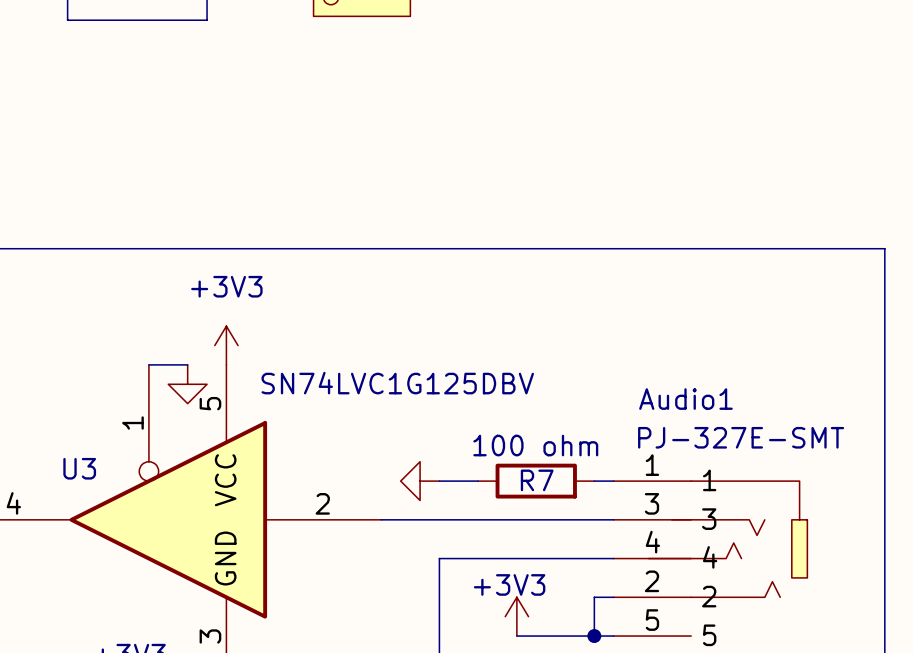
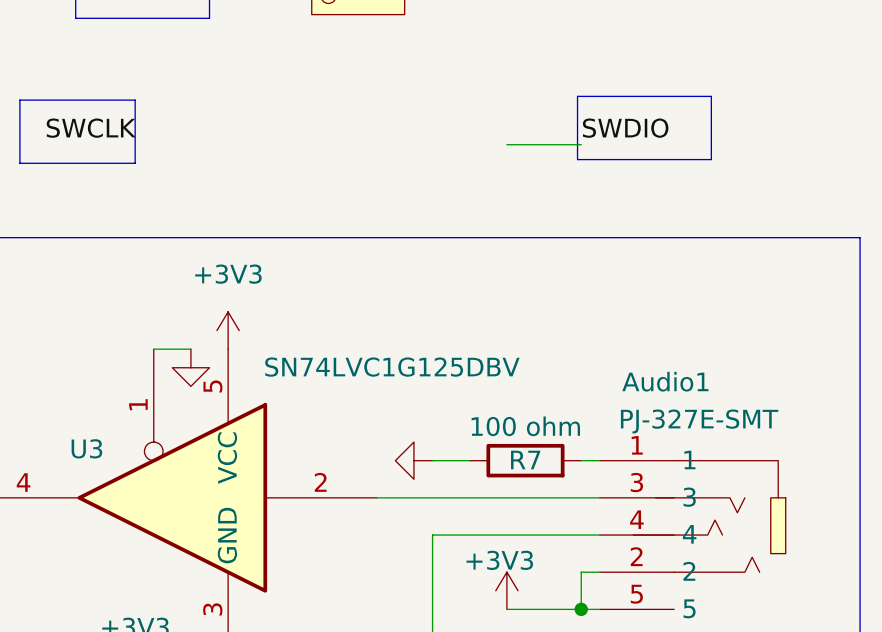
line: none -> (577, 96) (711, 96) (711, 159) (577, 159) (577, 96)
line: none -> (19, 100) (135, 100) (135, 163) (19, 163) (19, 100)
label: none -> SWCLK (91, 128)
label: none -> SWDIO (625, 128)
wire: none -> (506, 144) (581, 144)

